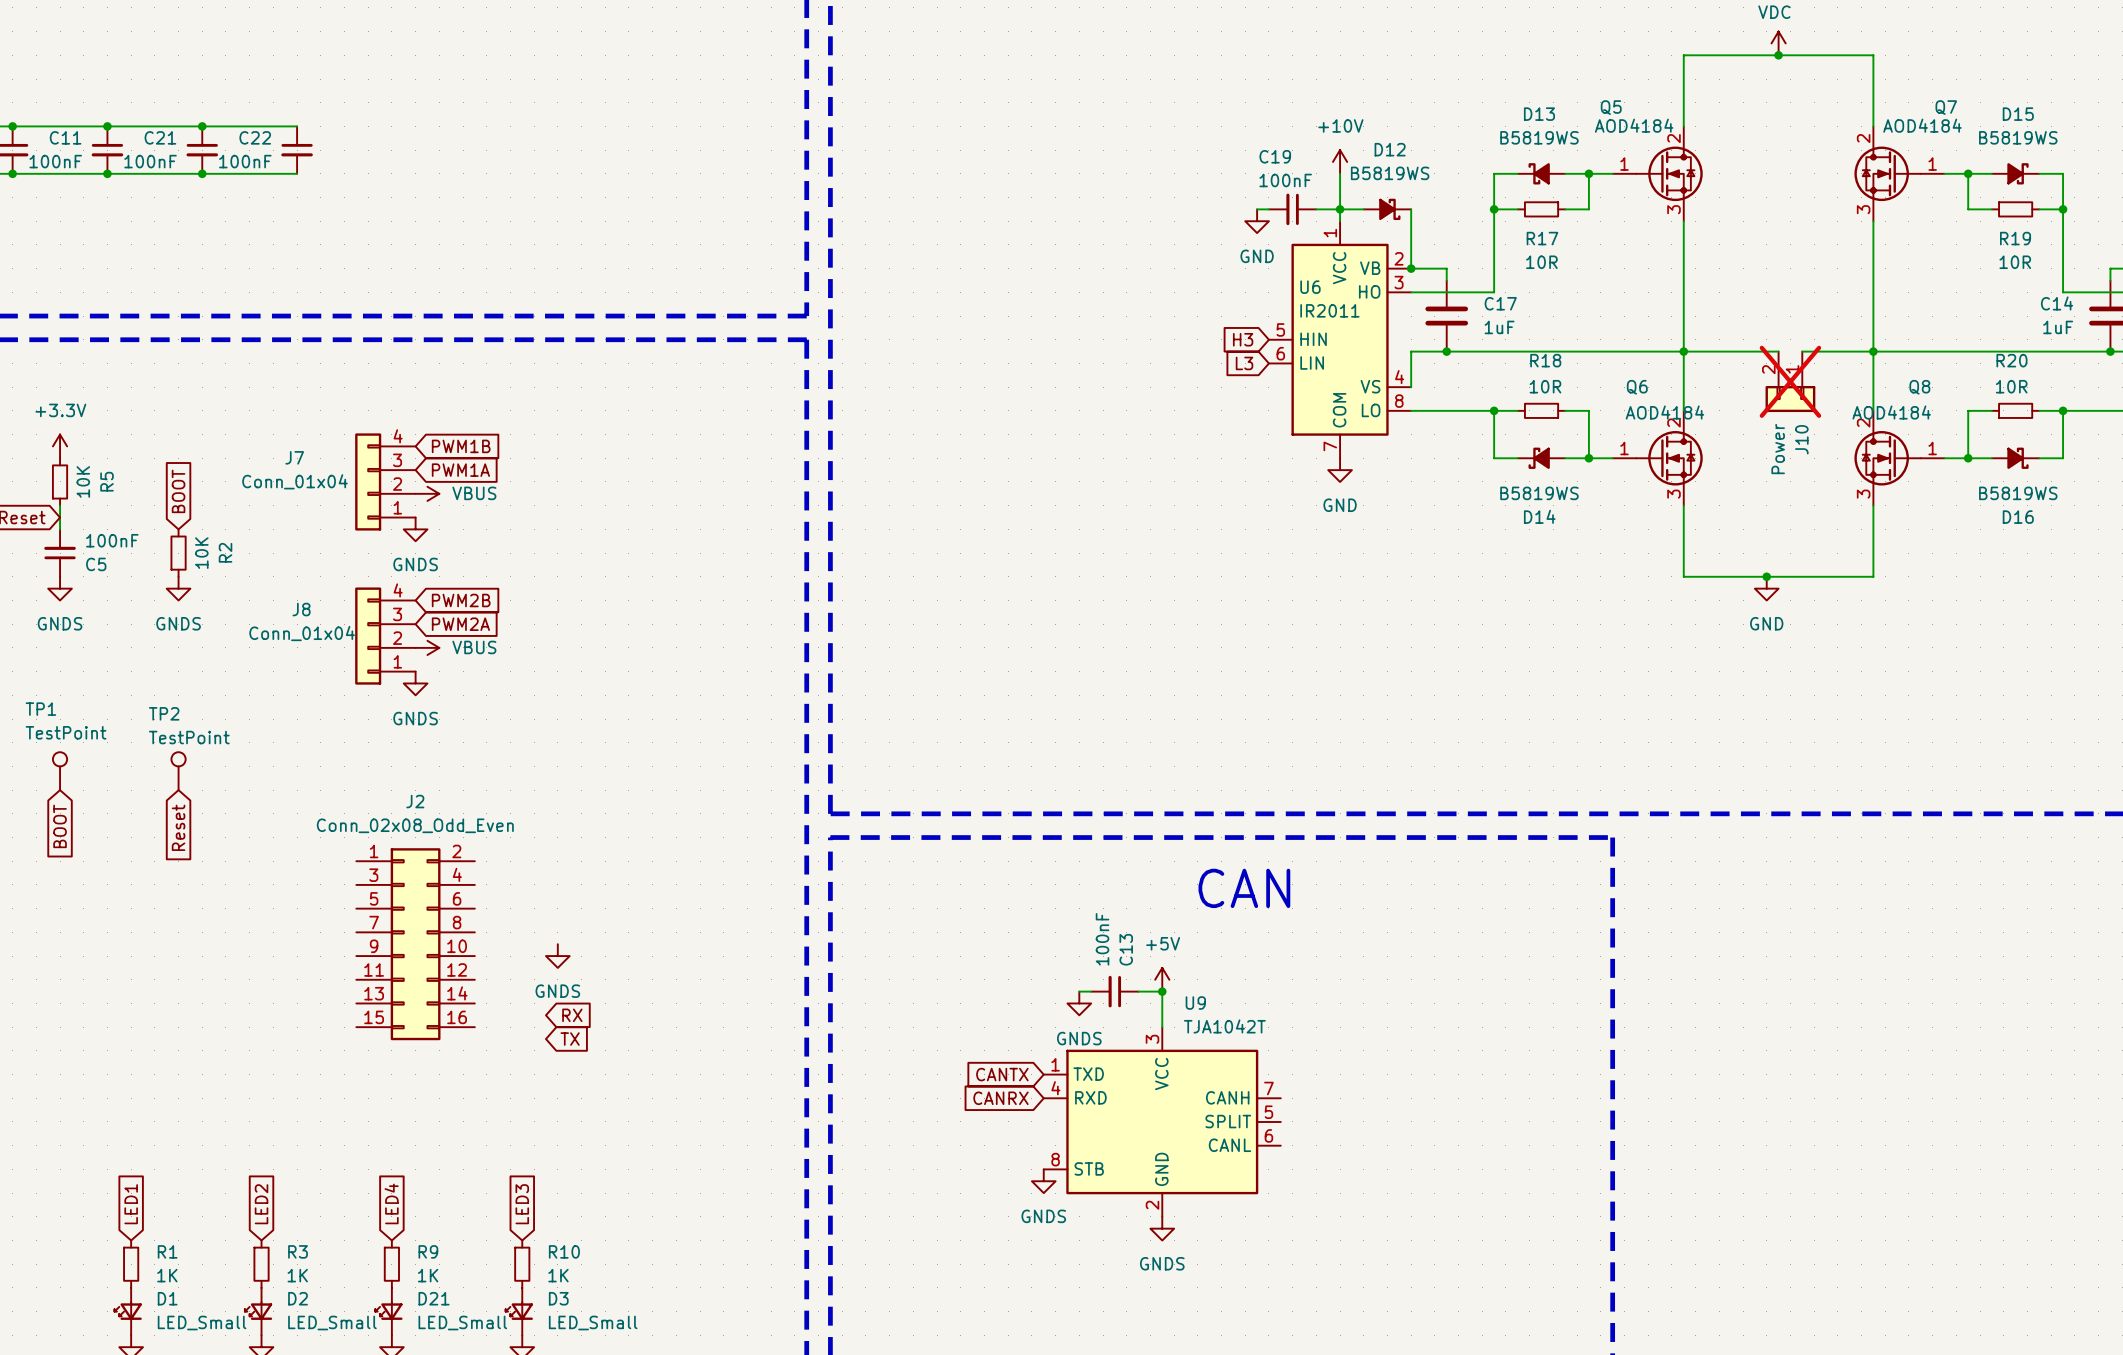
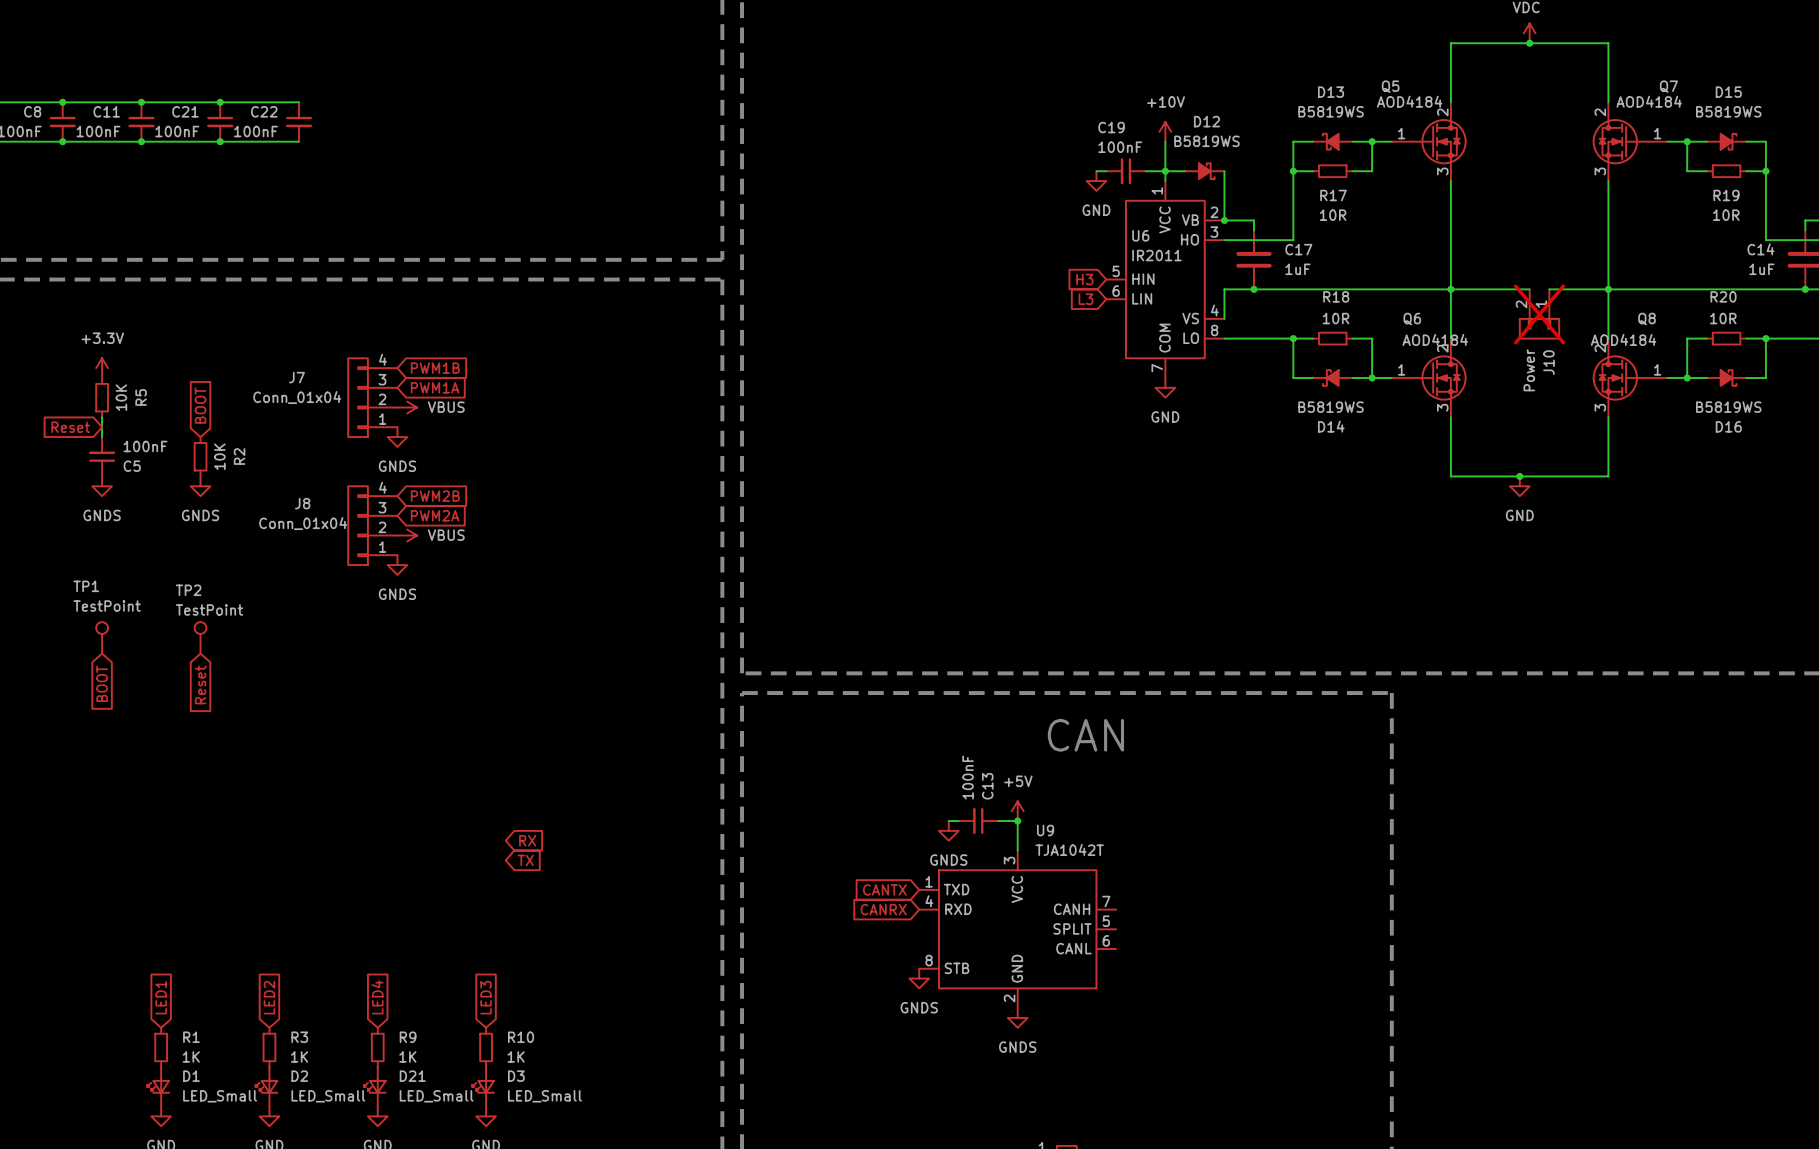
J2: Conn_02x08_Odd_Even (415, 944) -> none
power symbol: GNDS (557, 956) -> none

